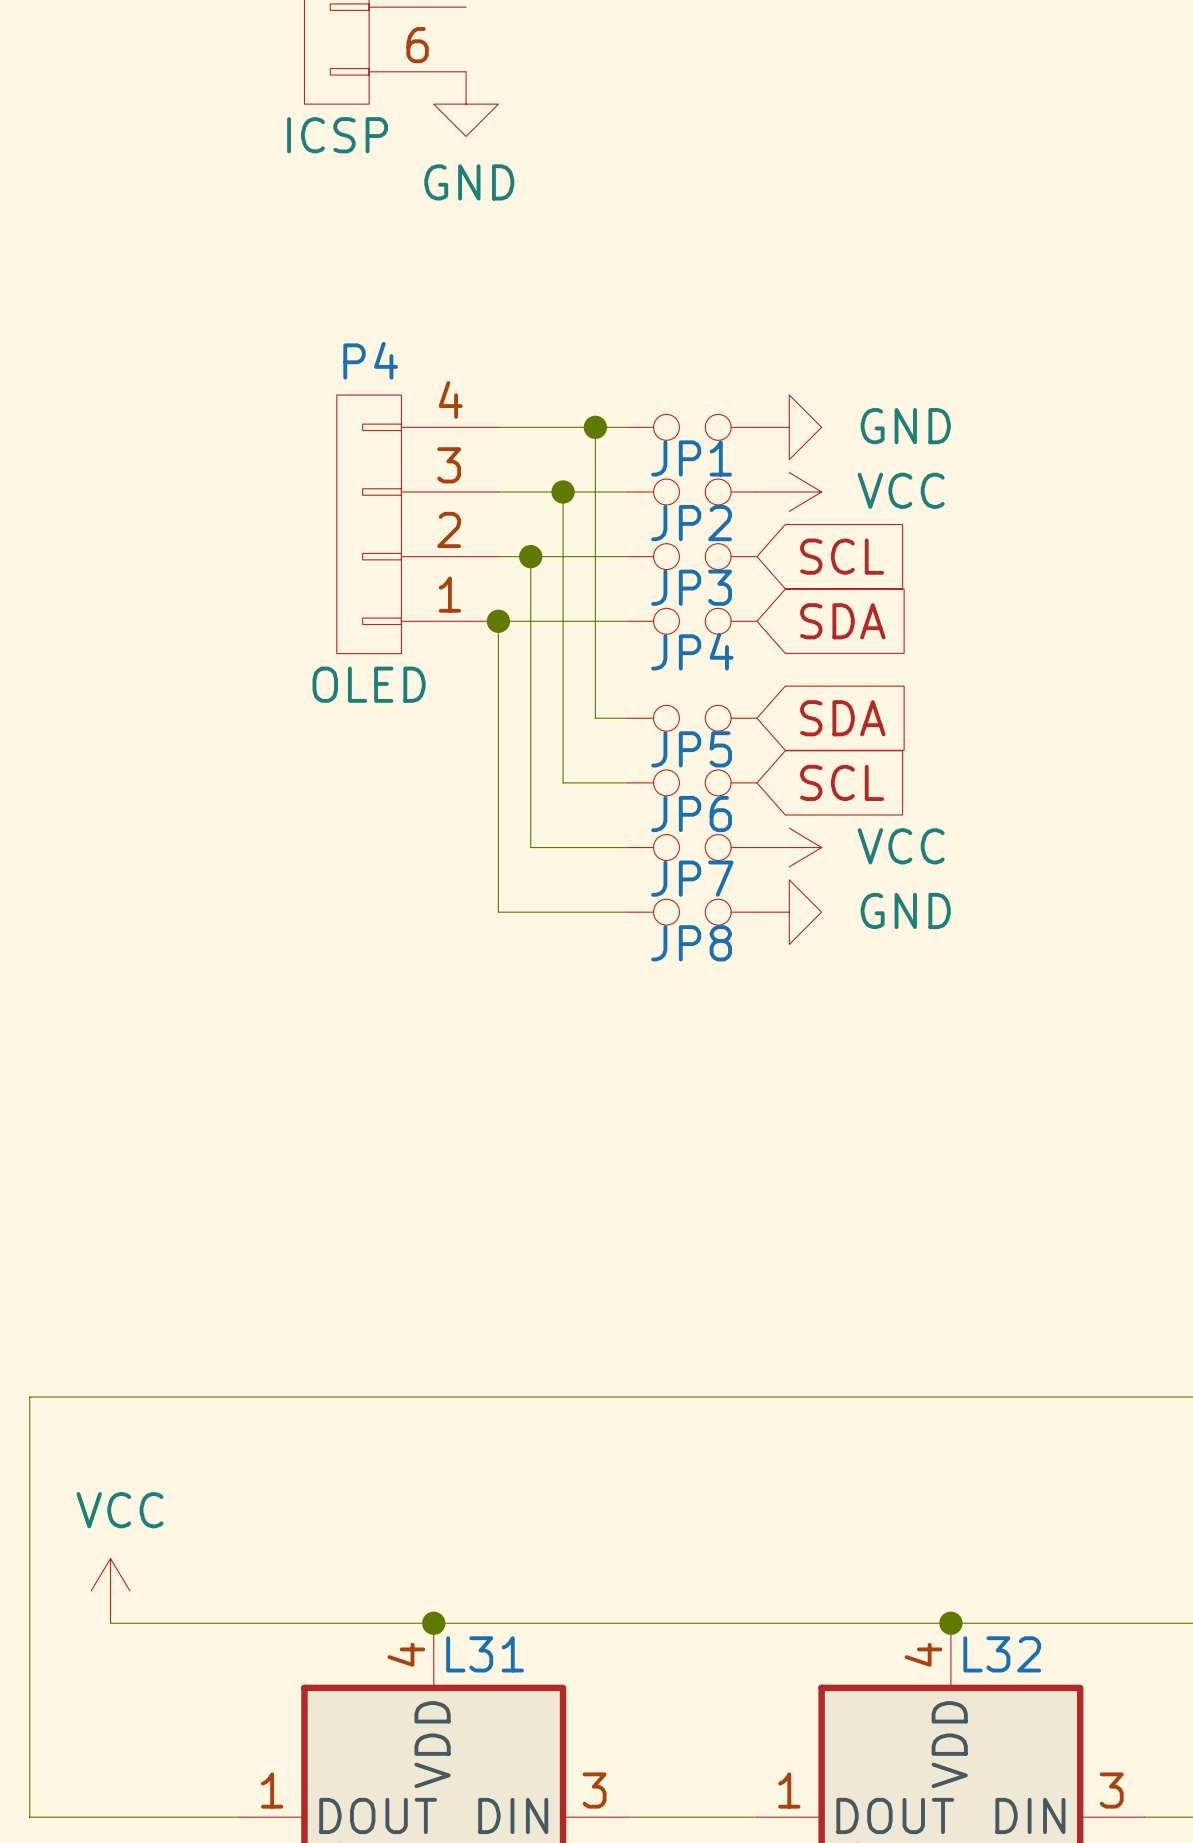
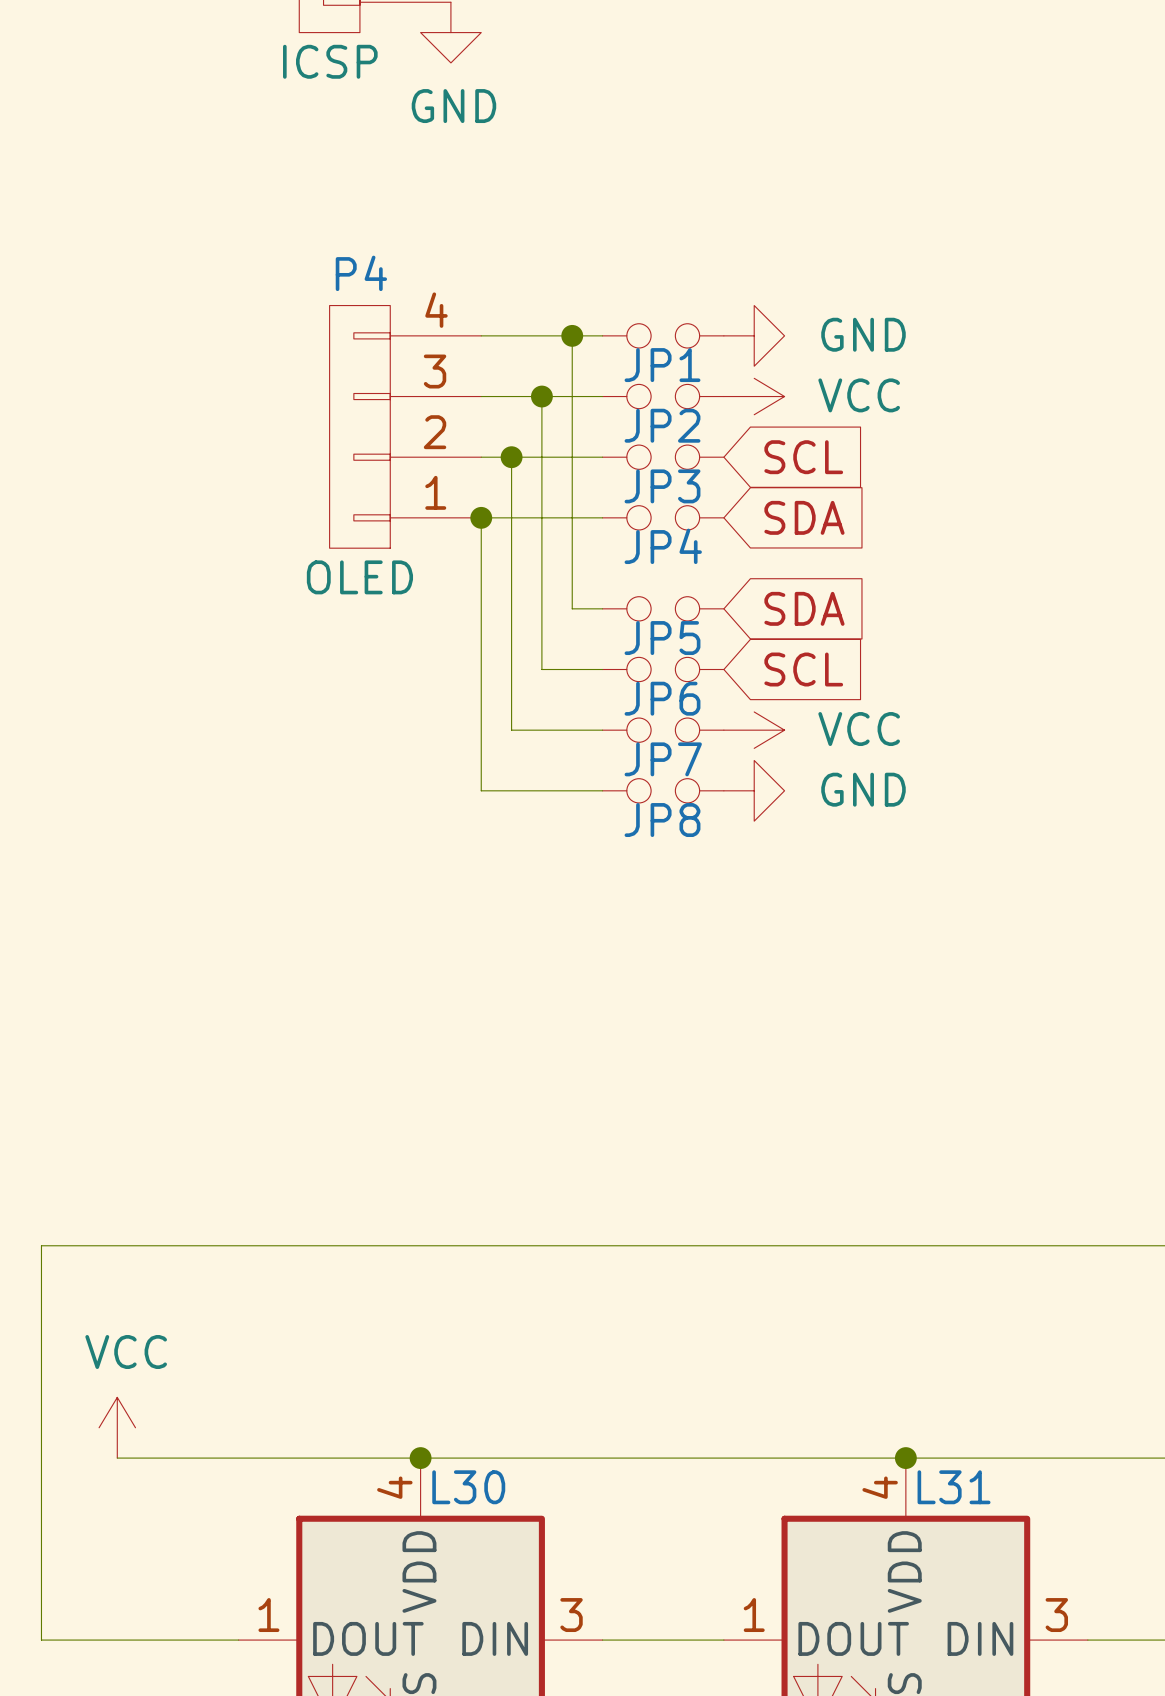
L31 name: L31 (485, 1654) -> L30 (468, 1487)
L32 name: L32 (1002, 1654) -> L31 (954, 1487)

